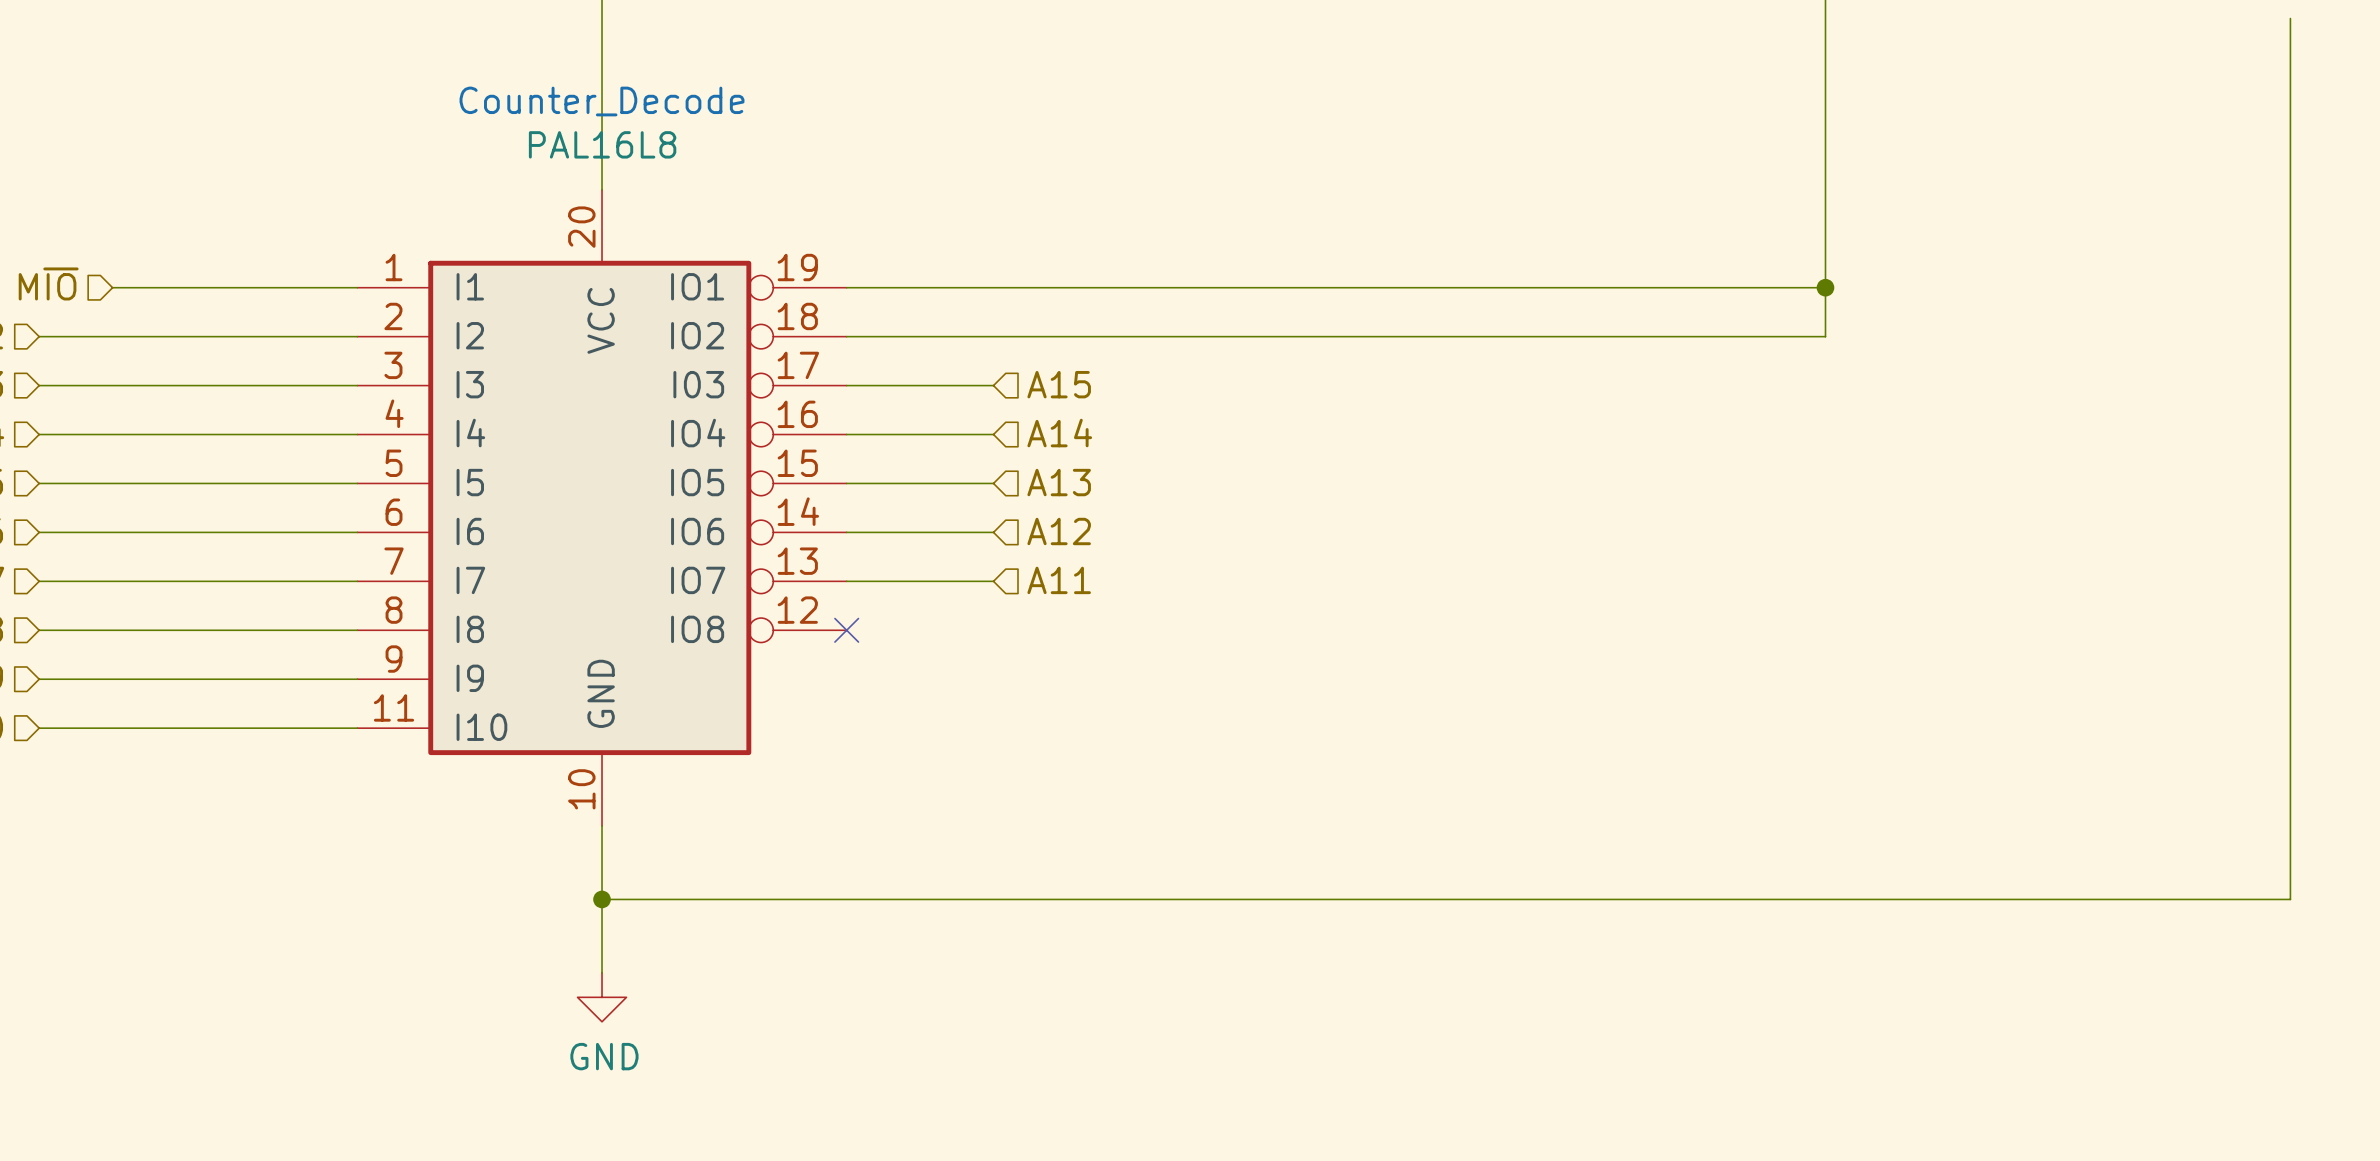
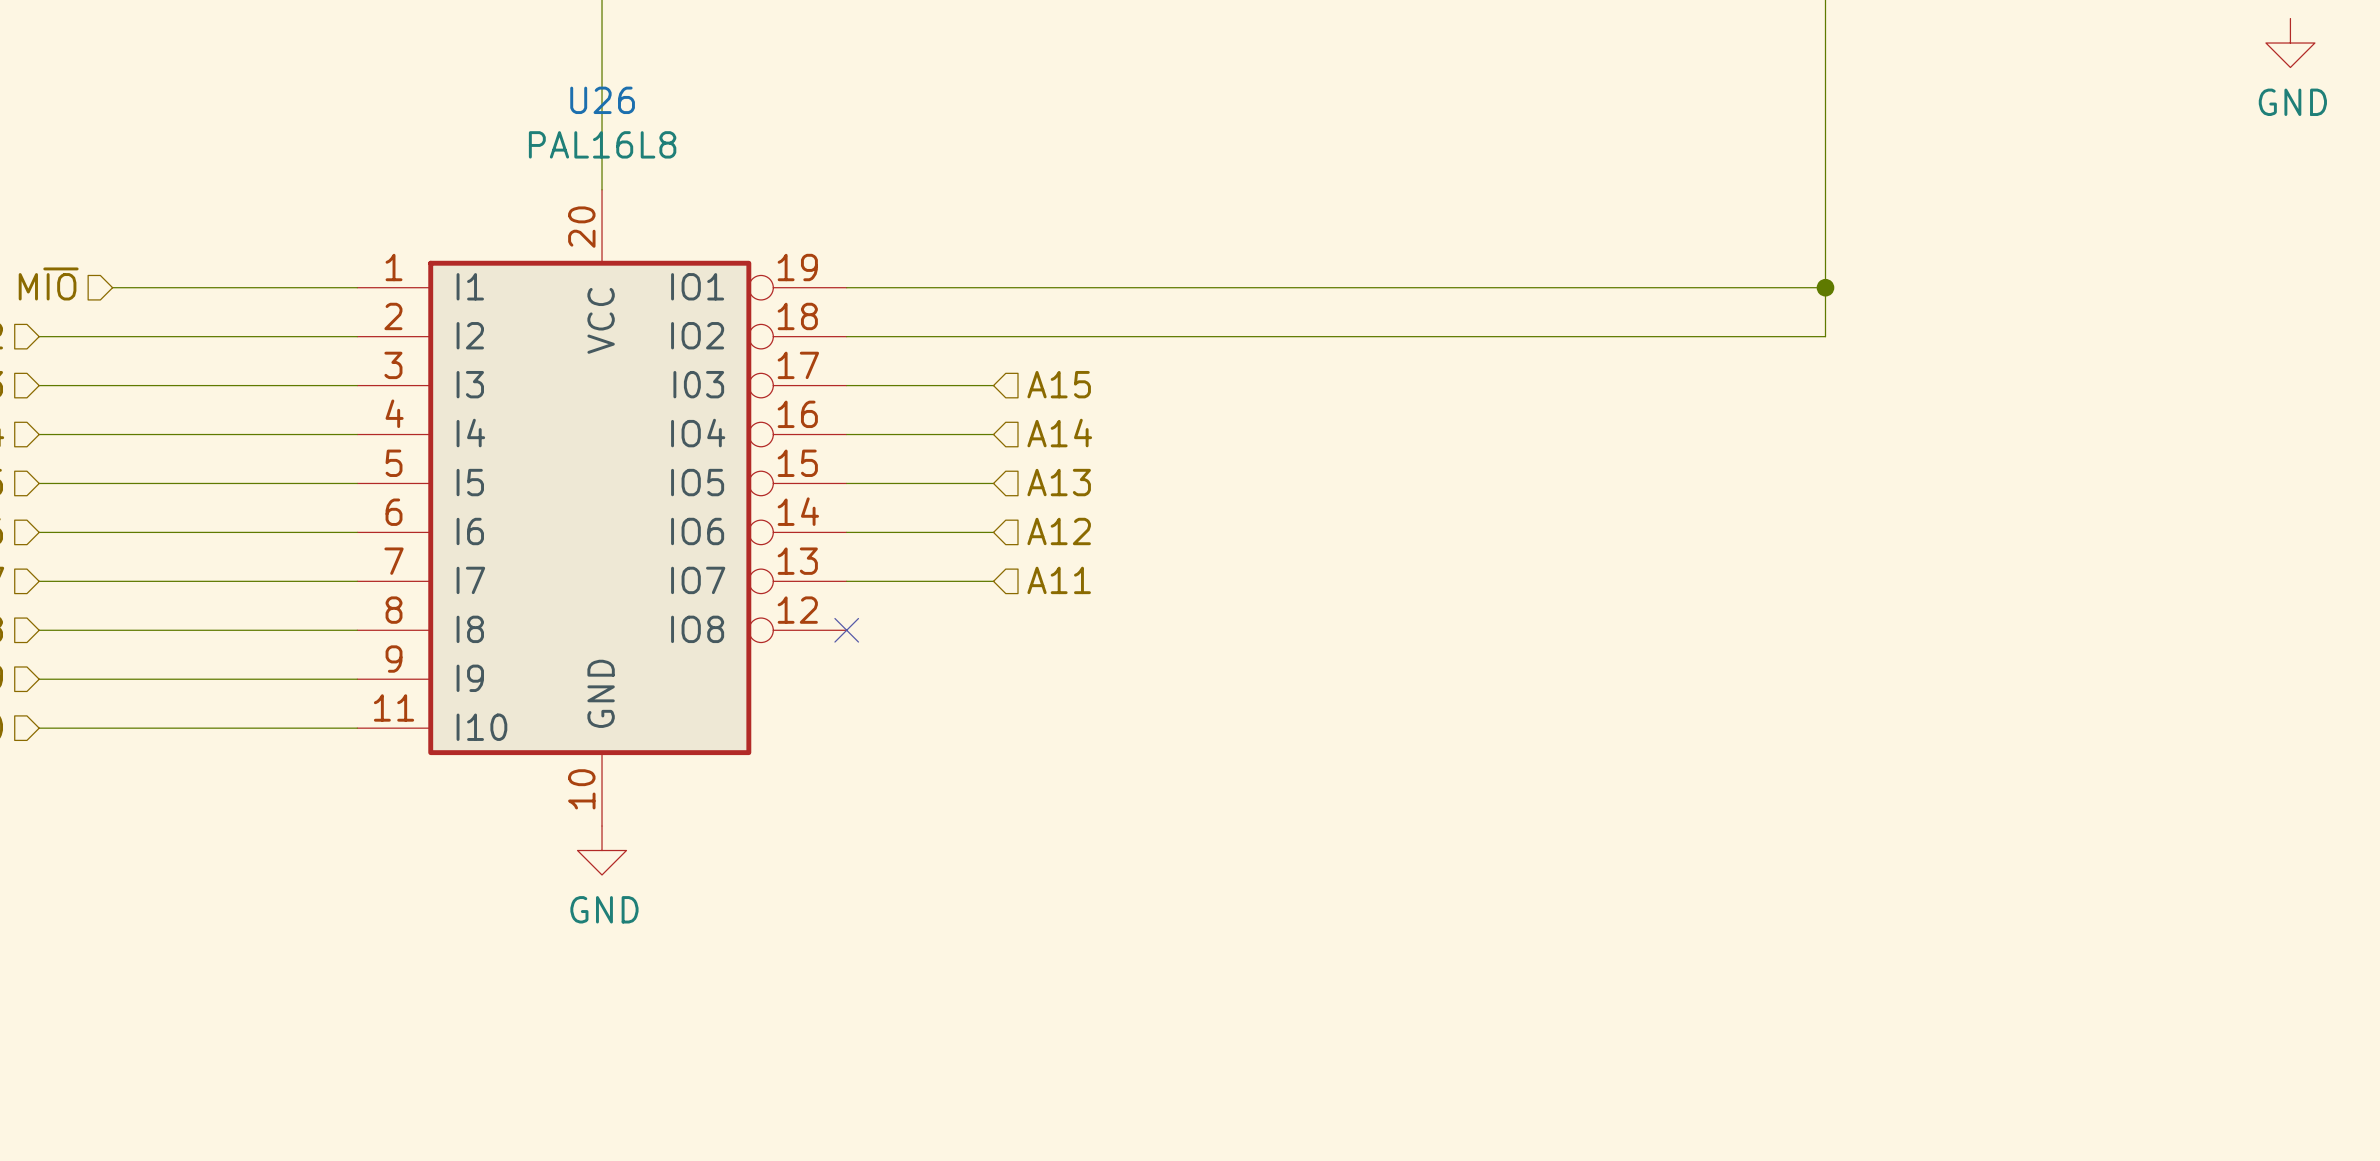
wire: (2290, 18) (2290, 899) (602, 899) -> none
power symbol: none -> GND (2290, 43)
Counter_Decode name: Counter_Decode (602, 101) -> U26 (602, 100)
wire: (602, 826) (602, 972) -> none
junction: (602, 899) -> none
power symbol position: GND (602, 997) -> GND (602, 850)

